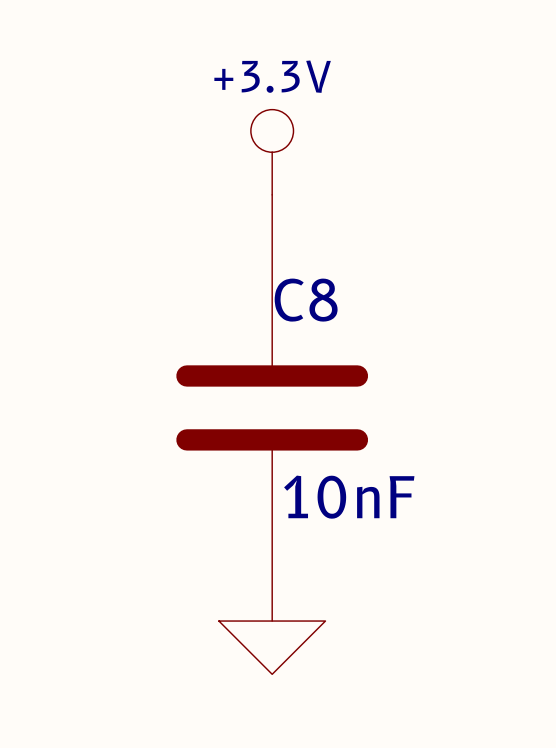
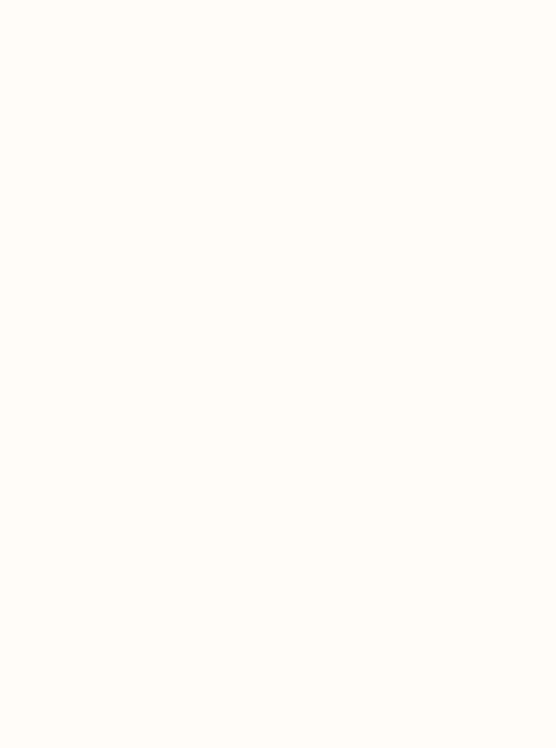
power symbol: +3.3V (272, 152) -> none
C8: 10nF (272, 407) -> none
power symbol: (272, 647) -> none

